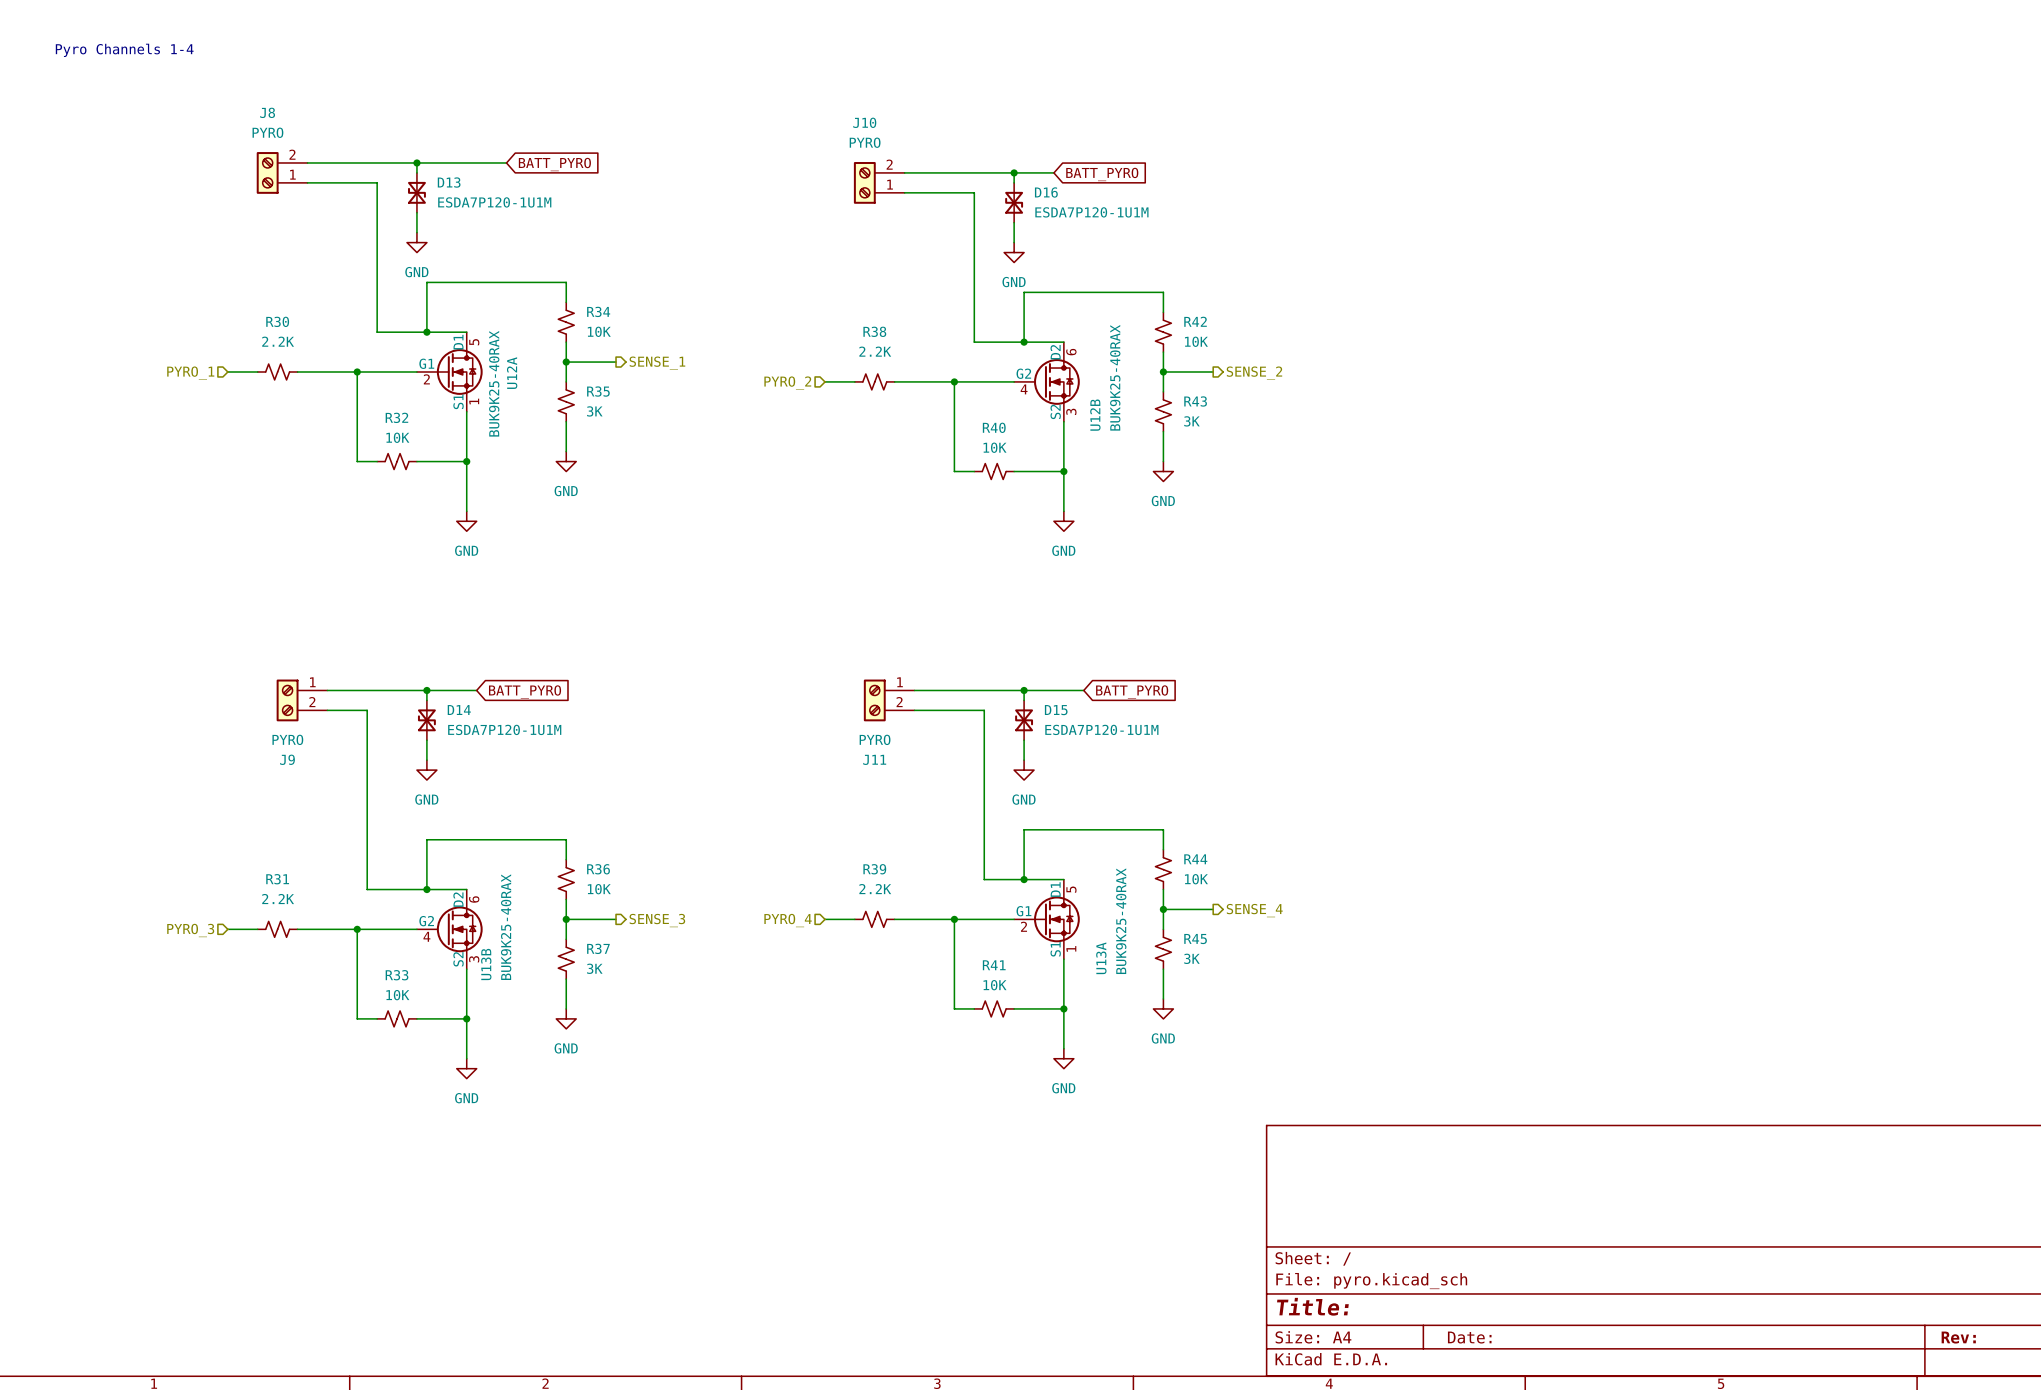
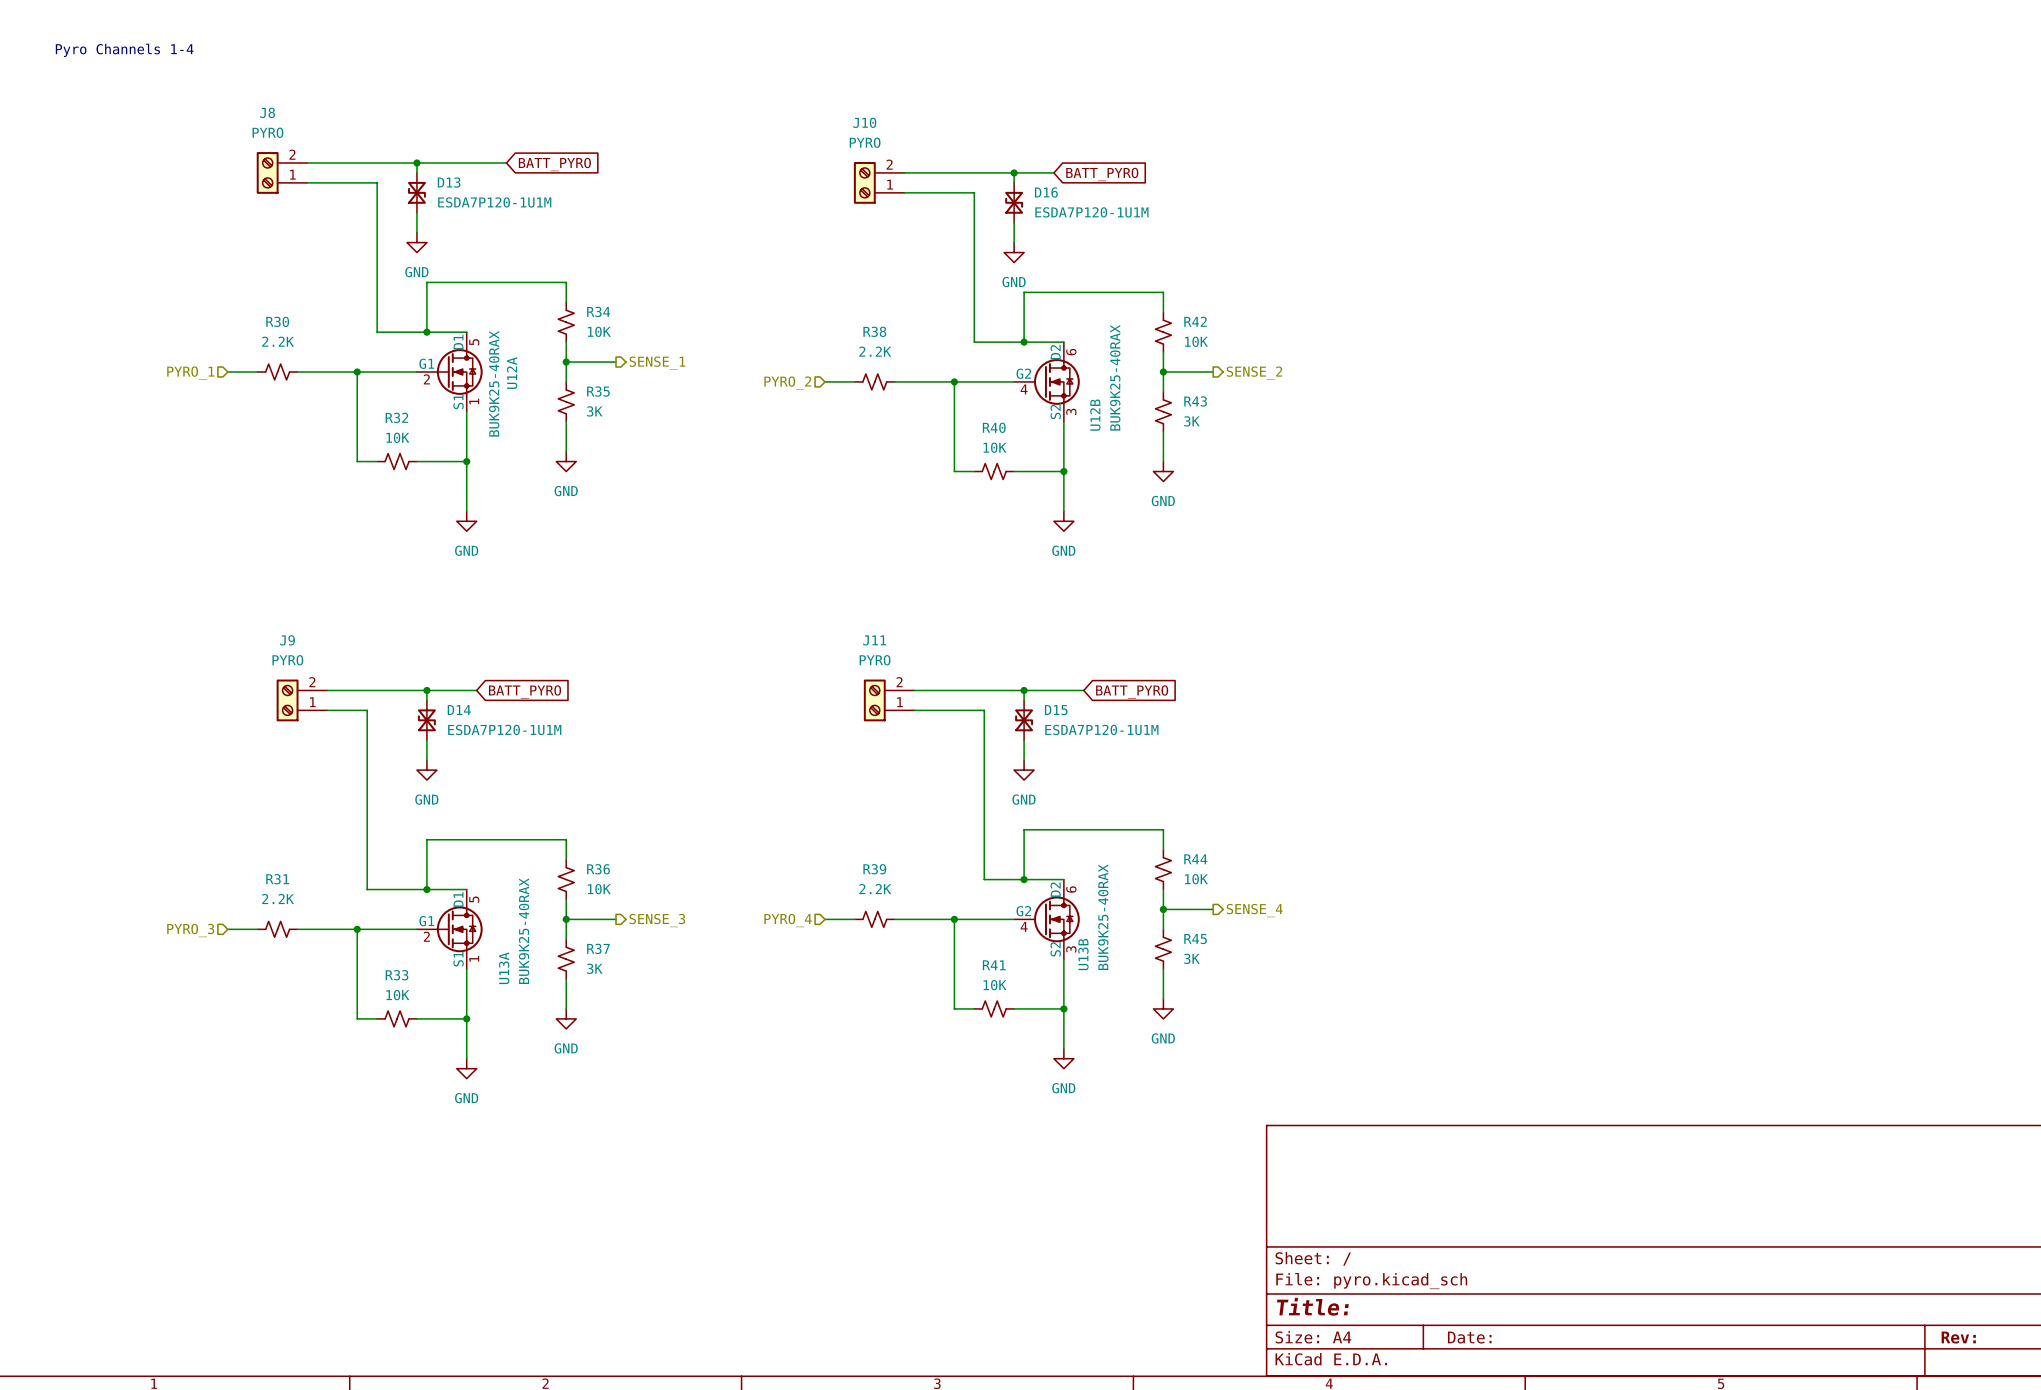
J9 flip: as is (287, 700) -> up-down (287, 700)
J11 flip: as is (874, 700) -> up-down (874, 700)
U13A position: (1046, 919) -> (449, 929)
U13B position: (449, 929) -> (1046, 919)

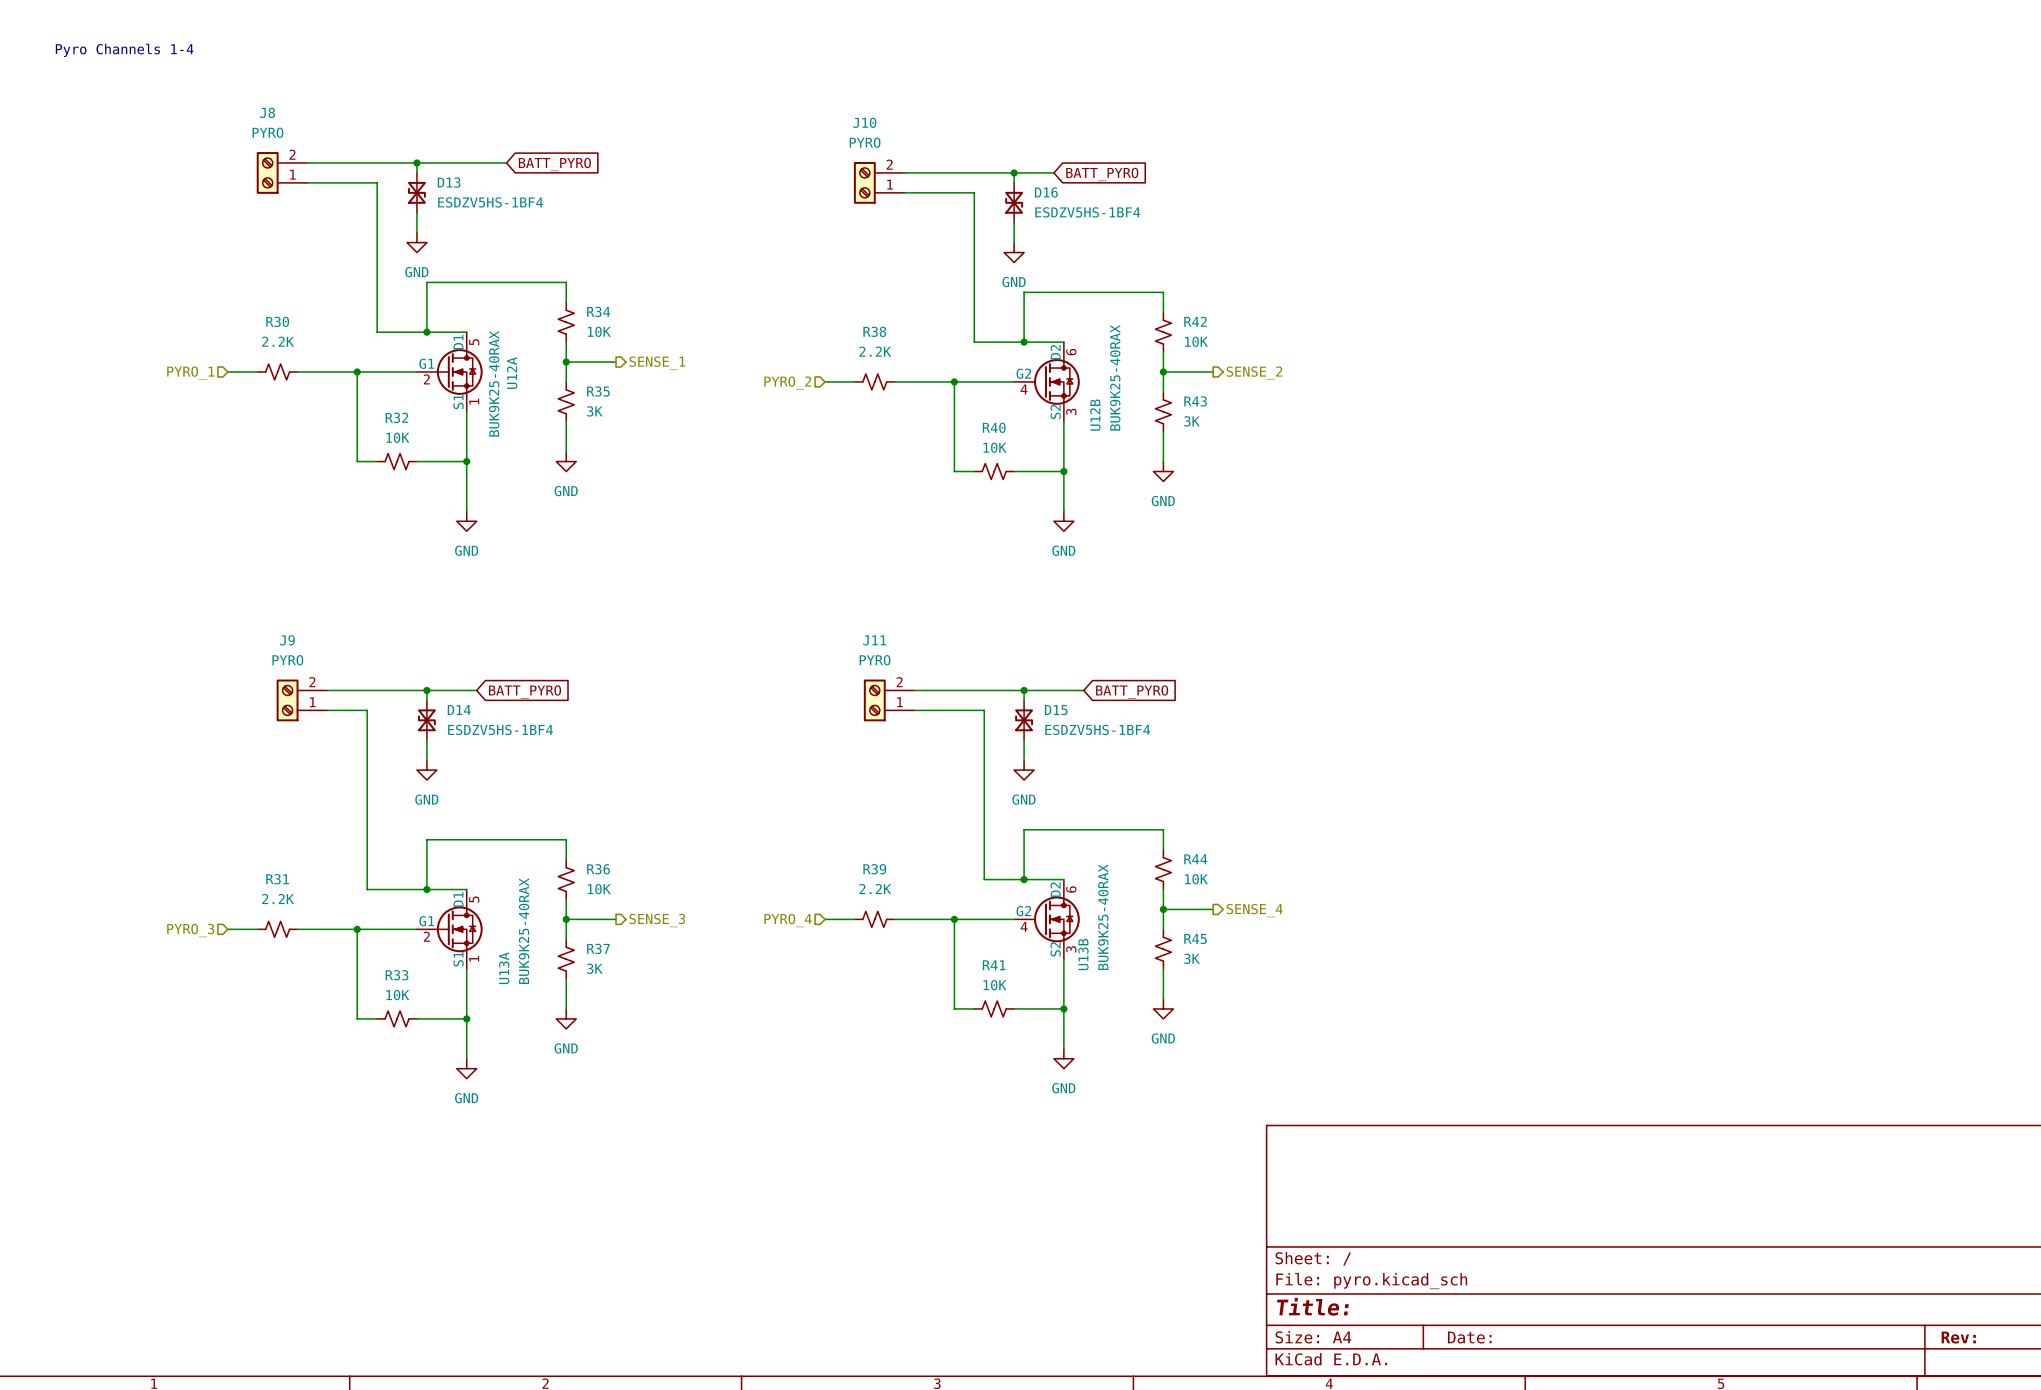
D13 value: ESDA7P120-1U1M (494, 202) -> ESDZV5HS-1BF4 (490, 202)
D16 value: ESDA7P120-1U1M (1091, 212) -> ESDZV5HS-1BF4 (1087, 212)
D14 value: ESDA7P120-1U1M (504, 729) -> ESDZV5HS-1BF4 (500, 729)
D15 value: ESDA7P120-1U1M (1101, 729) -> ESDZV5HS-1BF4 (1097, 729)

